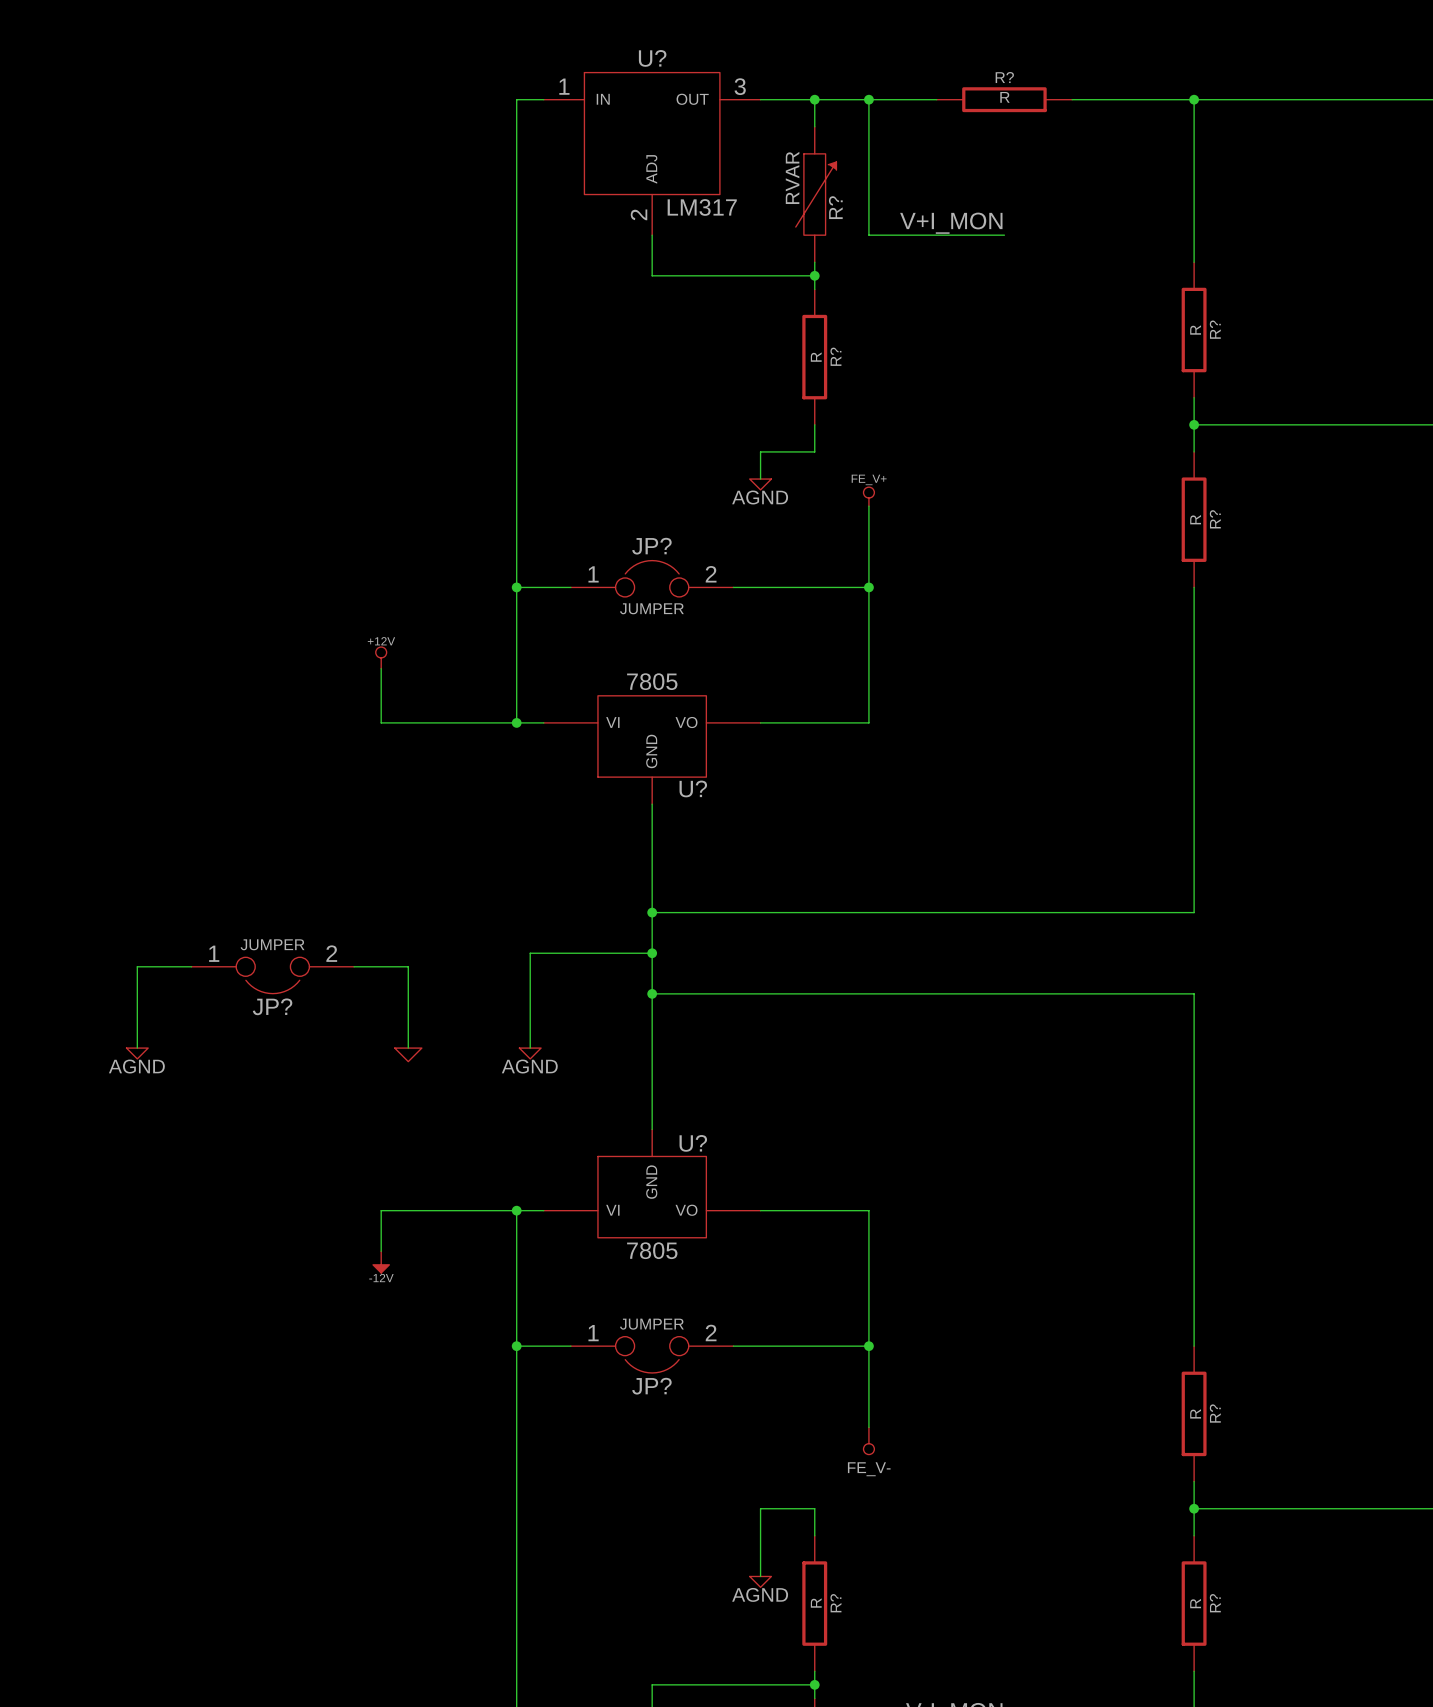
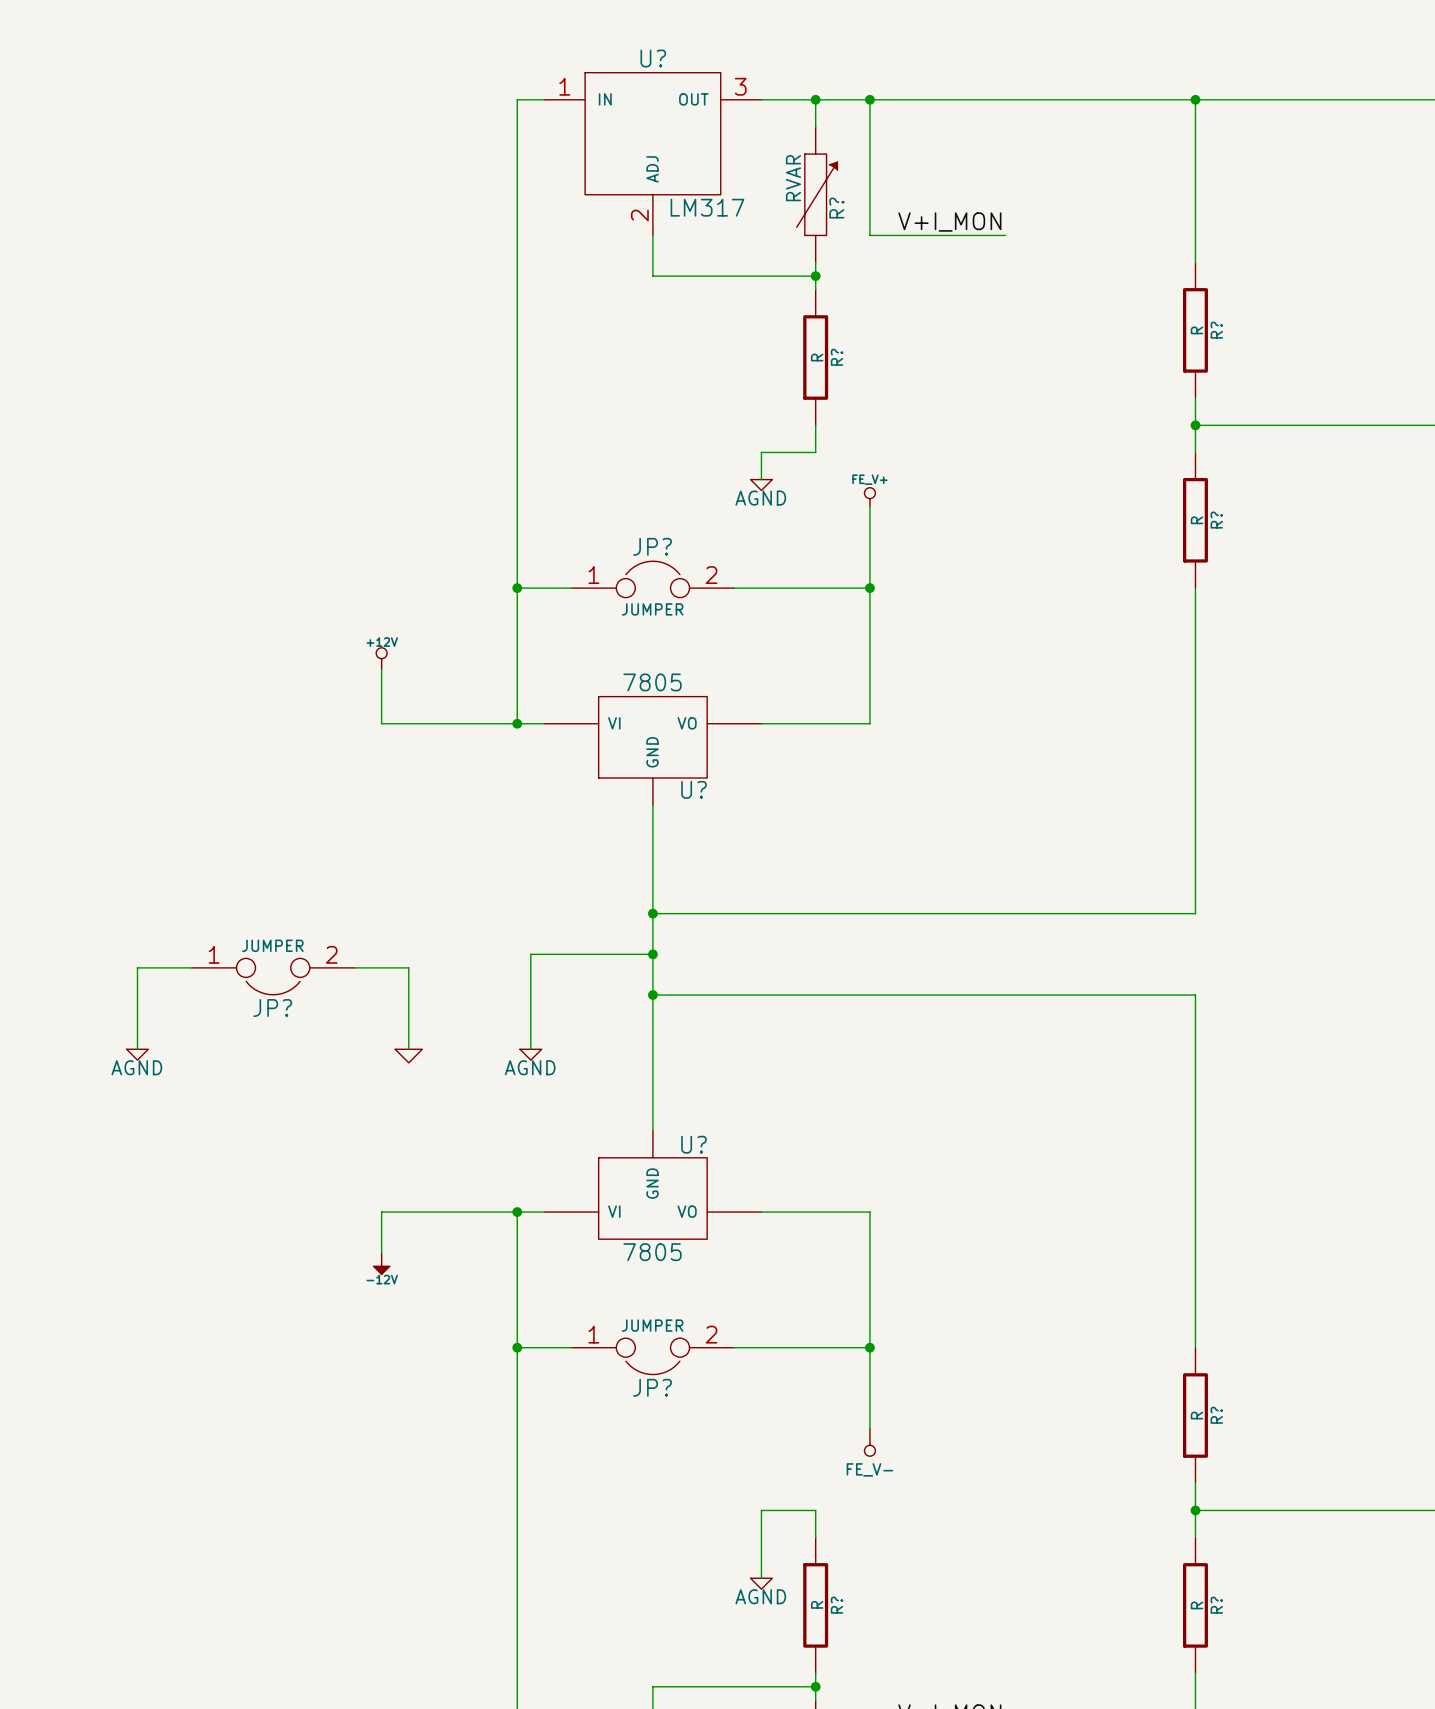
wire: none -> (937, 99) (1073, 99)
R?: R (1004, 99) -> none

